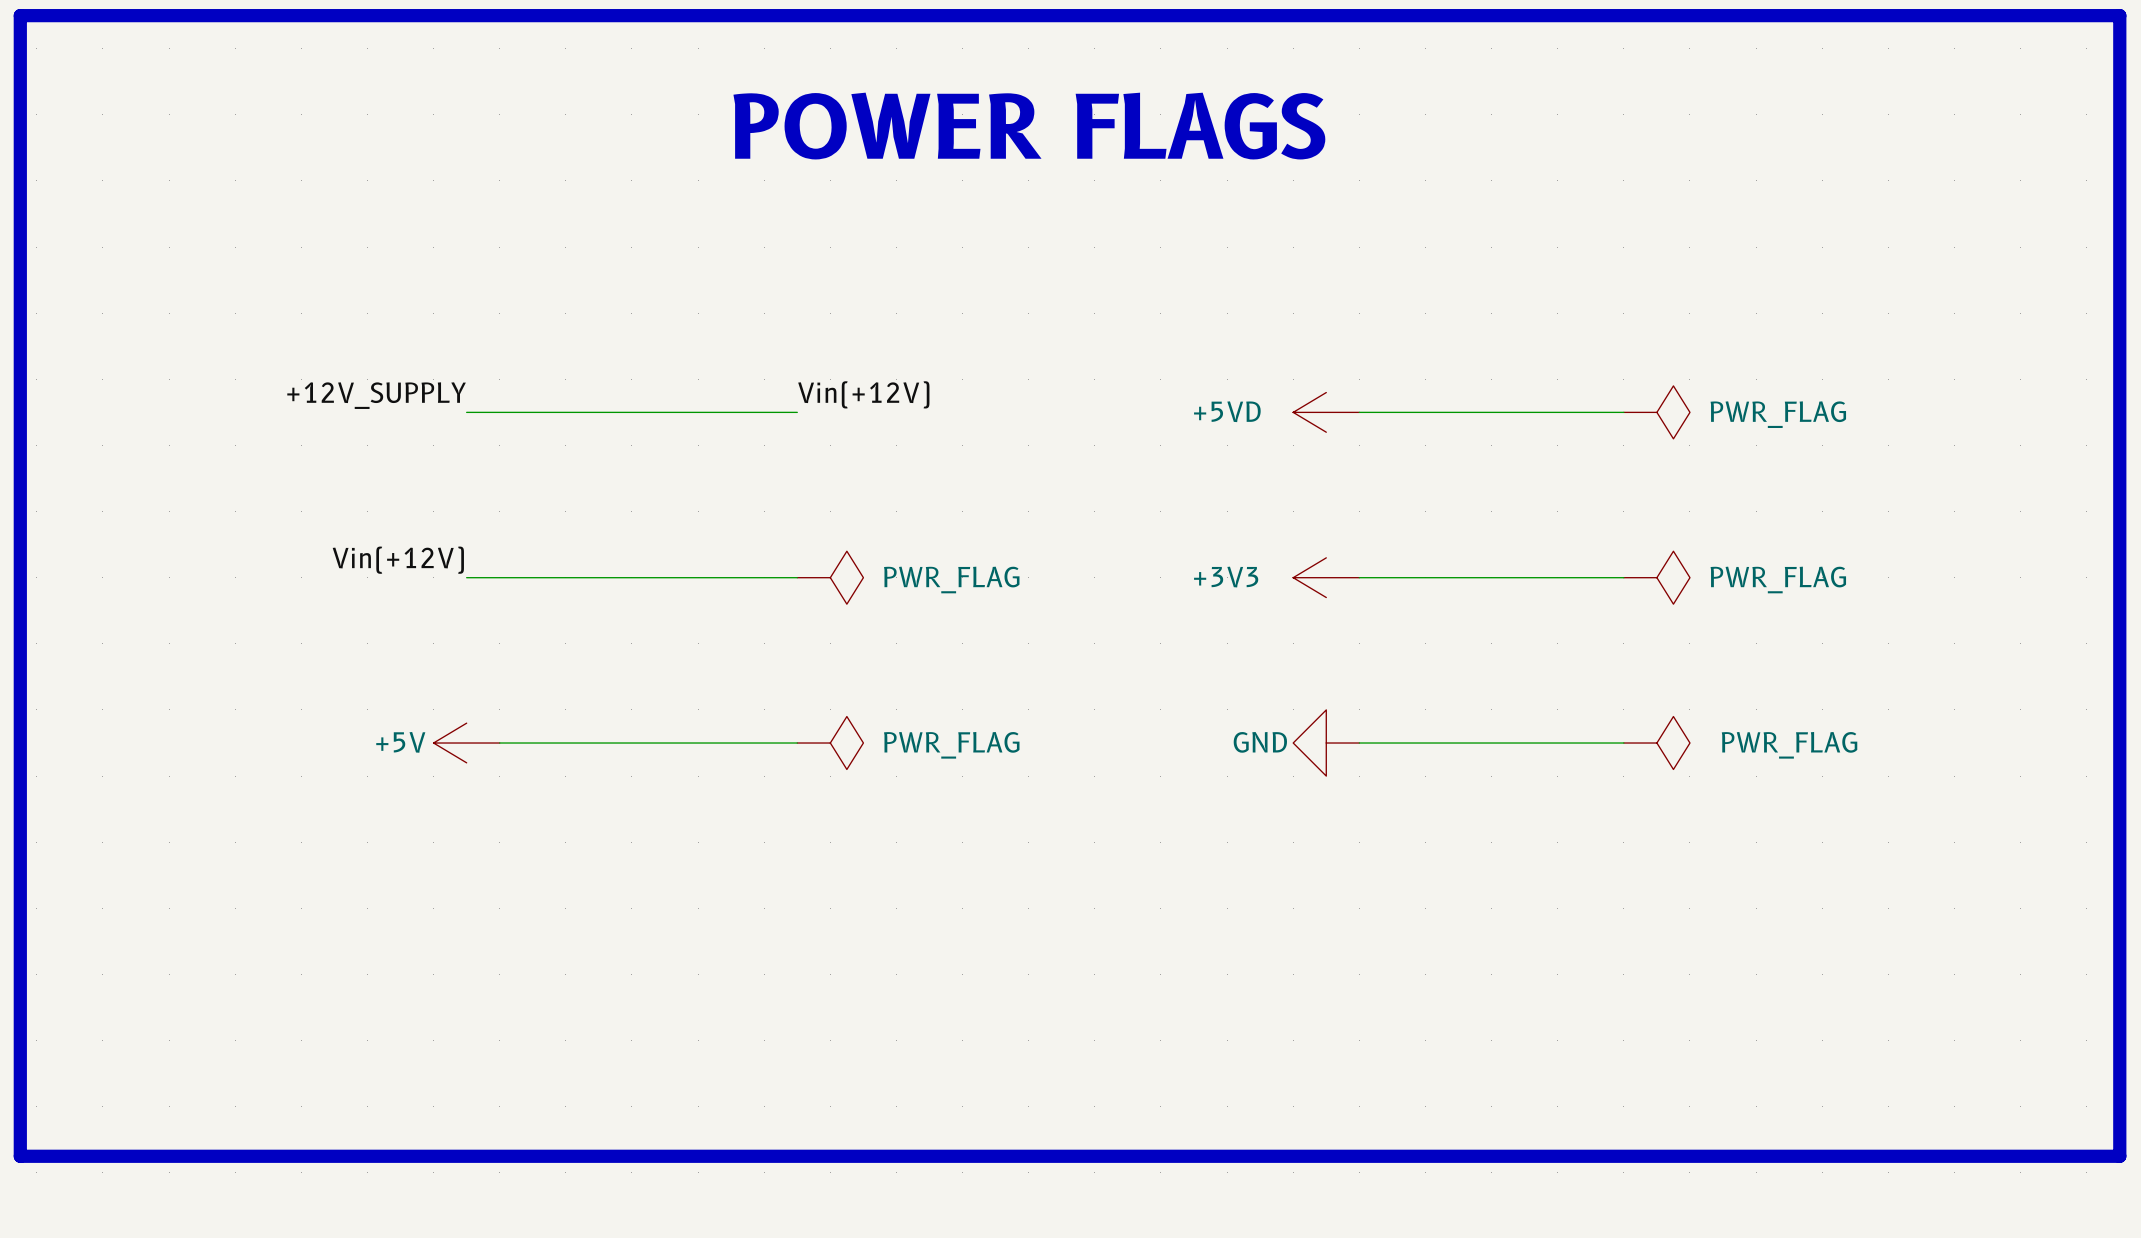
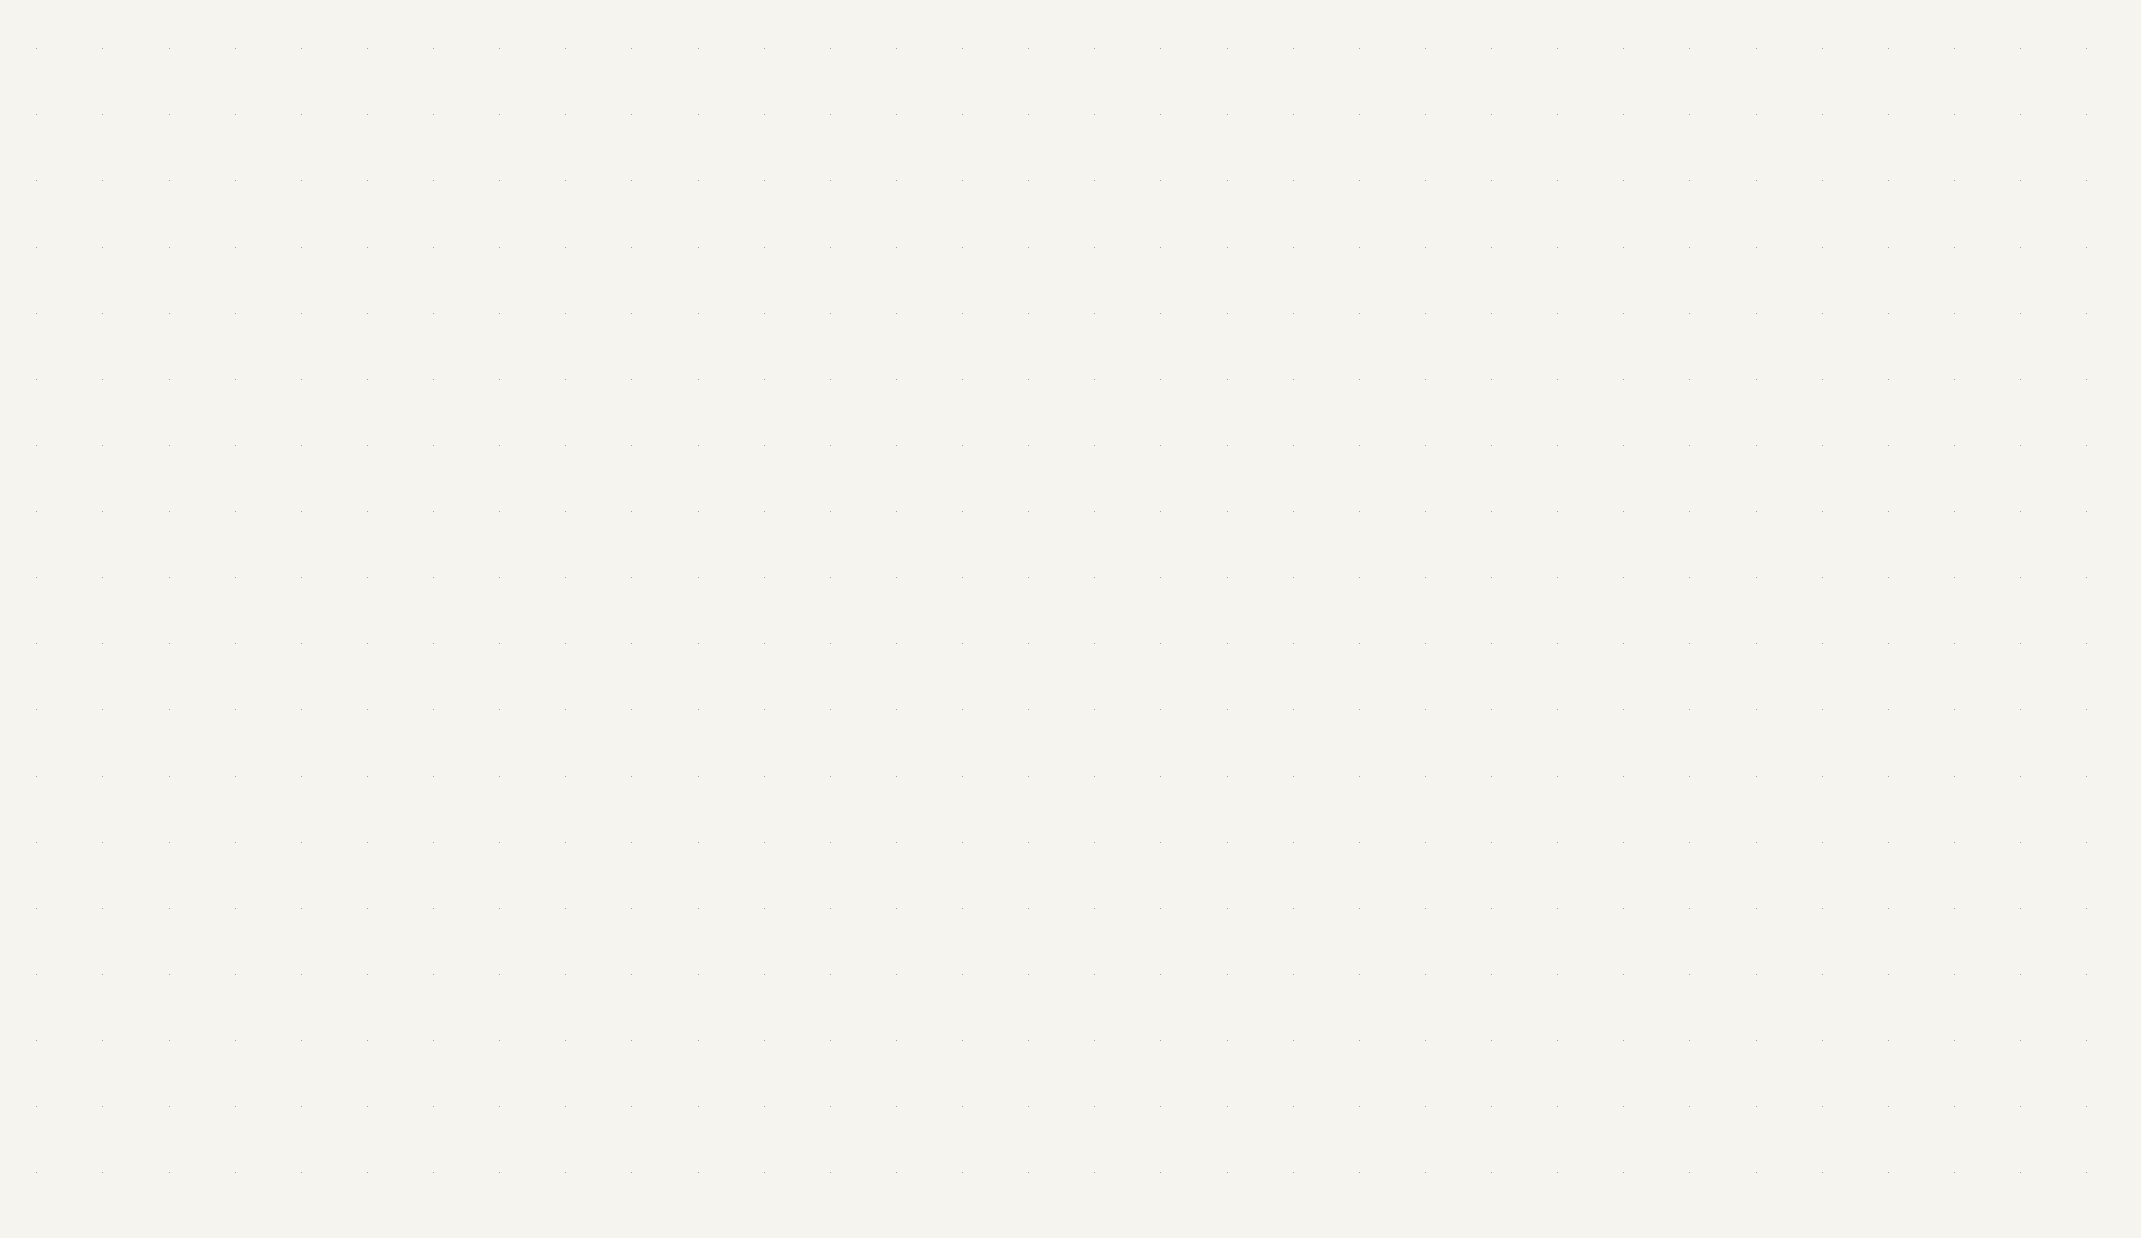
line: (20, 15) (2119, 15) (2119, 1156) (20, 1156) (20, 15) -> none
text: POWER FLAGS (1029, 126) -> none
label: Vin(+12V) (863, 394) -> none
label: +12V_SUPPLY (376, 395) -> none
wire: (466, 412) (797, 412) -> none
power symbol: +5VD (1326, 412) -> none
wire: (1359, 412) (1623, 412) -> none
power symbol: PWR_FLAG (1656, 412) -> none
label: Vin(+12V) (398, 560) -> none
wire: (466, 577) (797, 577) -> none
power symbol: PWR_FLAG (830, 577) -> none
power symbol: +3V3 (1326, 577) -> none
wire: (1359, 577) (1623, 577) -> none
power symbol: PWR_FLAG (1656, 577) -> none
power symbol: +5V (466, 743) -> none
wire: (499, 743) (797, 743) -> none
power symbol: PWR_FLAG (830, 743) -> none
power symbol: GND (1326, 743) -> none
wire: (1359, 743) (1623, 743) -> none
power symbol: PWR_FLAG (1656, 743) -> none

